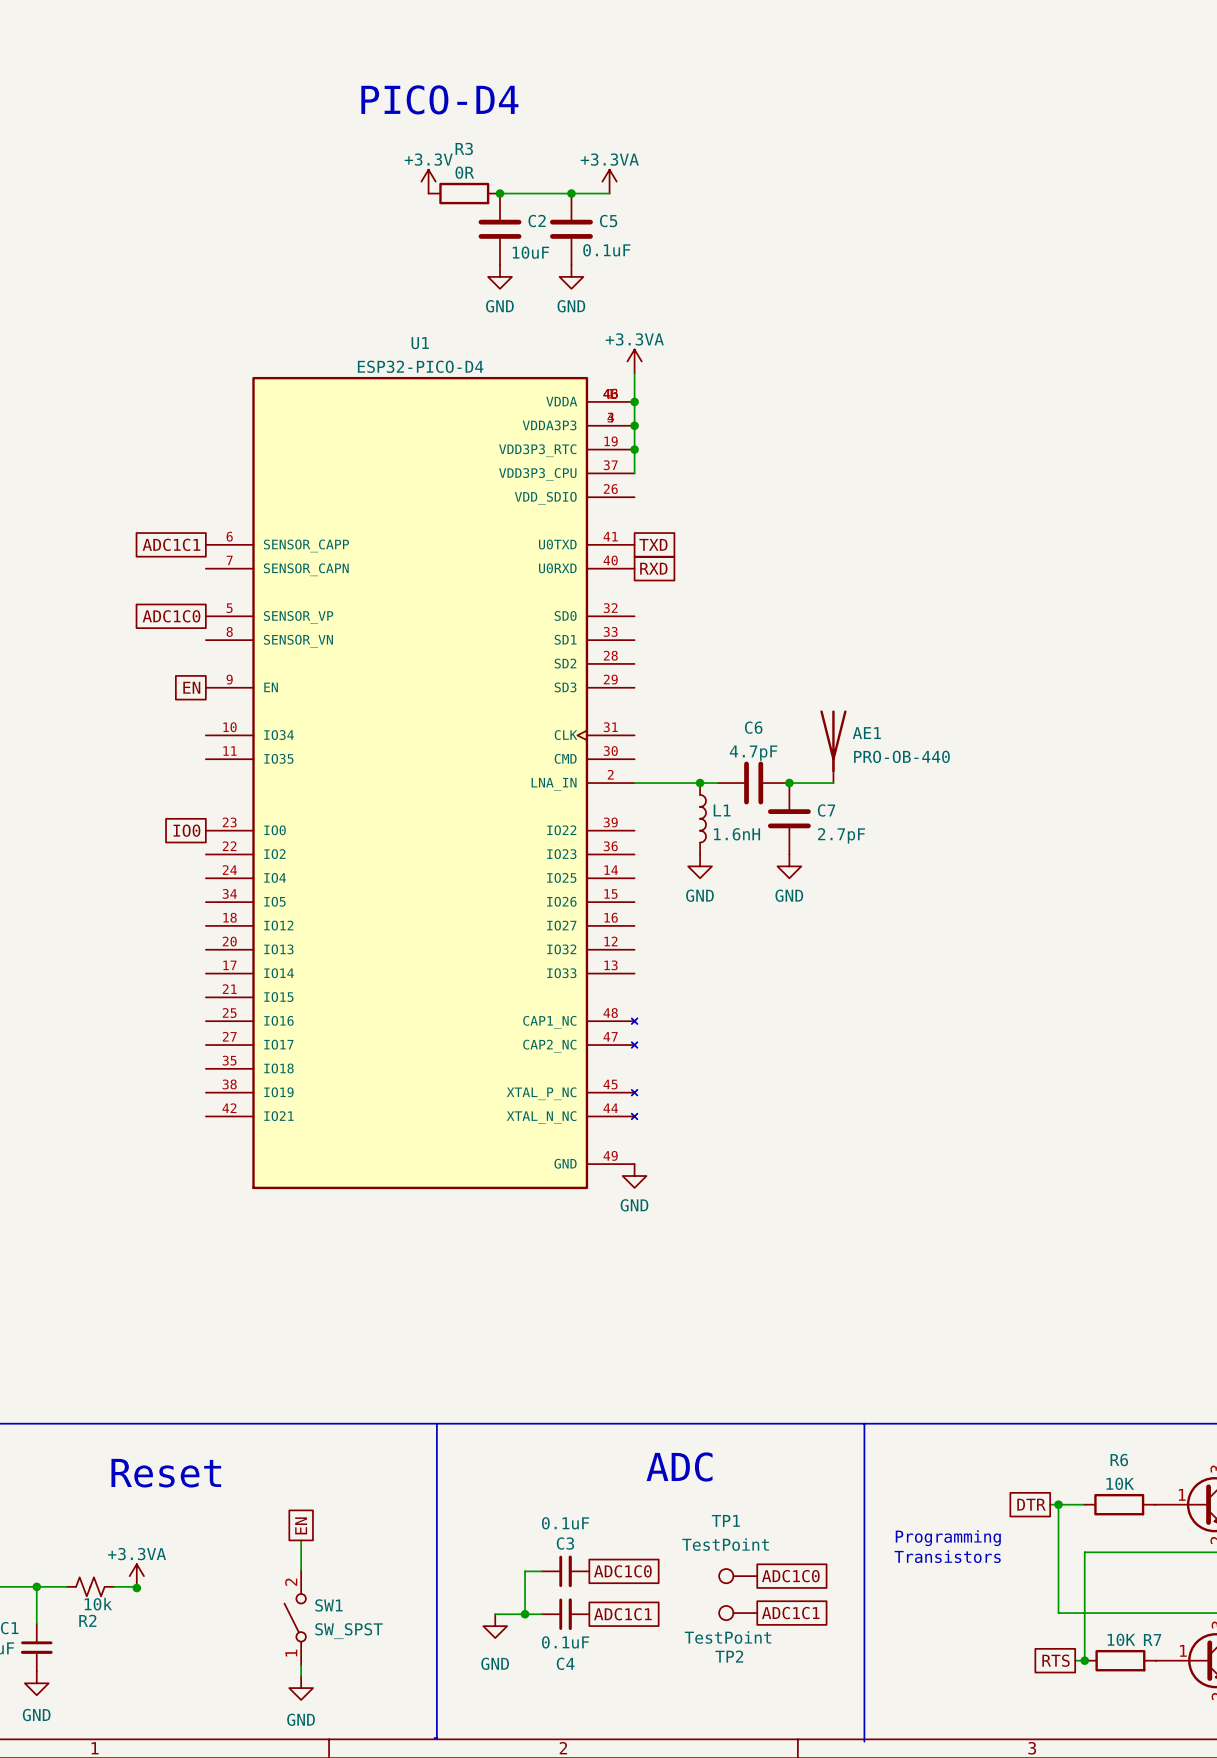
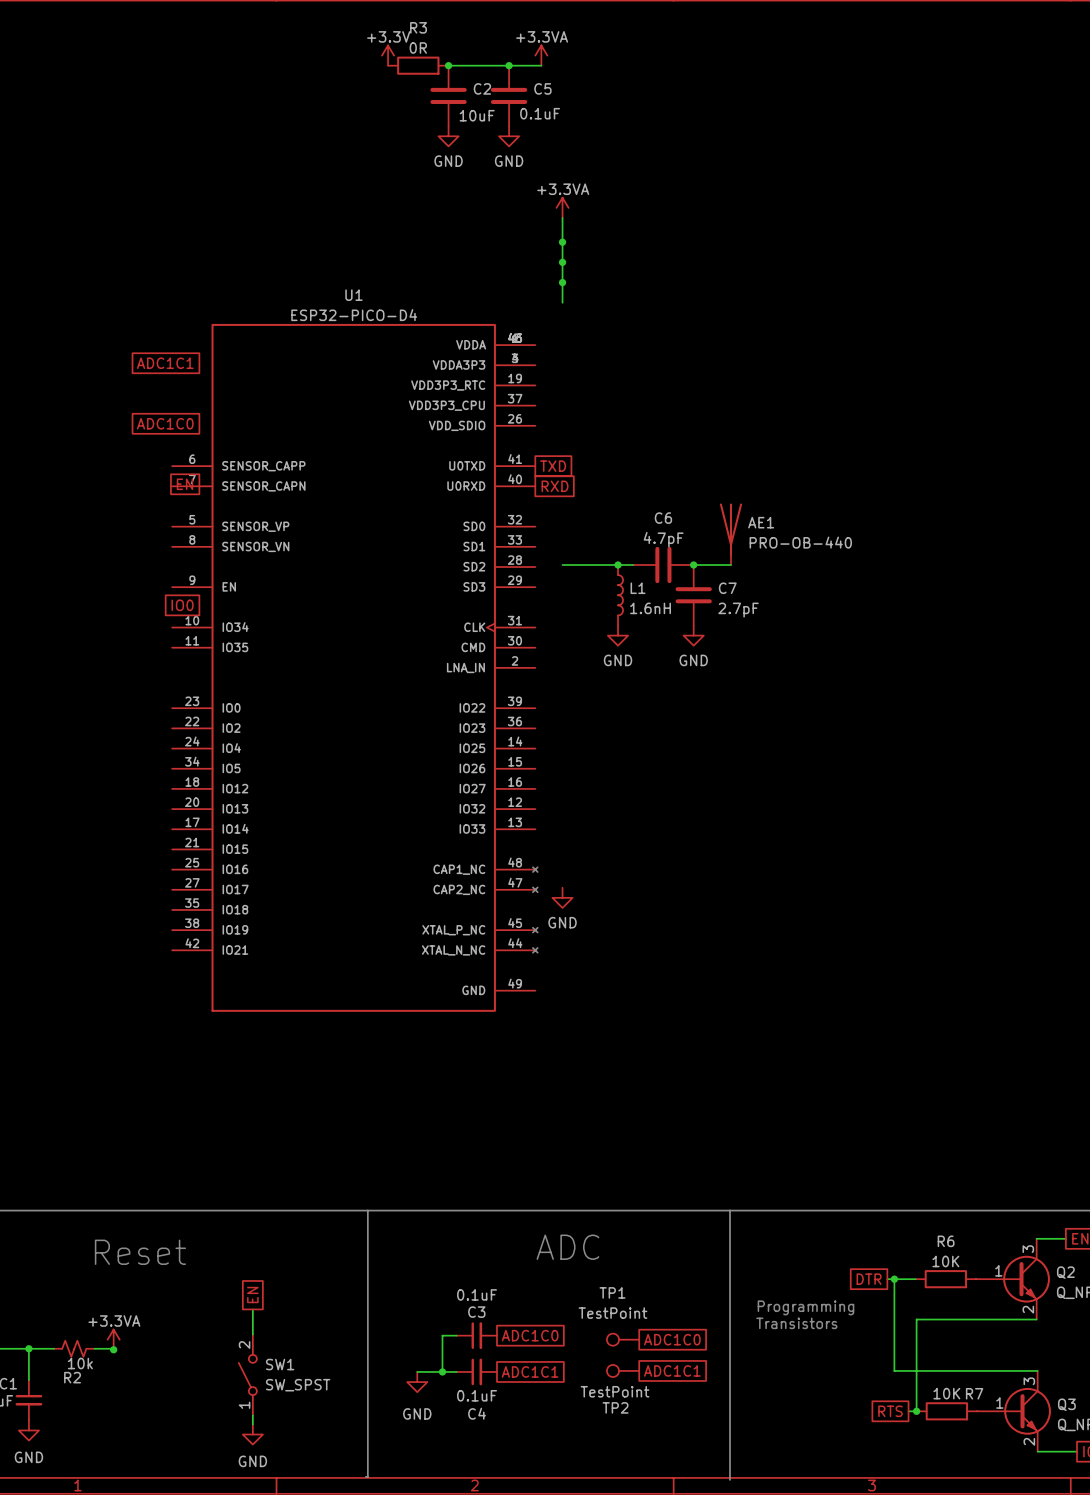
power symbol: none -> +3.3VA (541, 55)
junction: none -> (448, 65)
junction: none -> (509, 65)
text: PICO-D4 (439, 99) -> none
power symbol: none -> GND (448, 136)
power symbol: none -> GND (509, 136)
power symbol position: +3.3V (428, 181) -> +3.3V (388, 55)
power symbol: +3.3VA (609, 181) -> none
R3 position: (464, 193) -> (418, 65)
wire: (500, 193) (609, 193) -> (448, 65) (541, 65)
junction: (500, 193) -> none
junction: (571, 193) -> none
C2 position: (500, 229) -> (448, 95)
C5 position: (571, 229) -> (509, 95)
power symbol: none -> +3.3VA (562, 207)
power symbol: GND (500, 276) -> none
power symbol: GND (571, 276) -> none
junction: none -> (562, 242)
junction: none -> (562, 262)
junction: none -> (562, 282)
power symbol: +3.3VA (634, 361) -> none
wire: (634, 373) (634, 473) -> (562, 217) (562, 302)
junction: (634, 401) -> none
junction: (634, 425) -> none
junction: (634, 449) -> none
global label position: ADC1C1 (171, 544) -> ADC1C1 (165, 363)
global label position: ADC1C0 (171, 616) -> ADC1C0 (165, 423)
junction: none -> (618, 564)
junction: none -> (693, 564)
global label position: EN (191, 687) -> EN (184, 484)
power symbol: none -> GND (618, 635)
power symbol: none -> GND (693, 635)
AE1 position: (833, 746) -> (731, 534)
wire: (634, 783) (717, 783) -> (562, 564) (633, 564)
junction: (700, 783) -> none
C6 position: (753, 783) -> (663, 564)
wire: (789, 783) (833, 783) -> (693, 564) (731, 564)
junction: (789, 783) -> none
L1 position: (703, 818) -> (620, 595)
C7 position: (789, 818) -> (693, 595)
global label position: IO0 (186, 830) -> IO0 (182, 605)
power symbol: GND (700, 866) -> none
power symbol: GND (789, 866) -> none
power symbol: none -> GND (562, 897)
power symbol: GND (634, 1176) -> none

